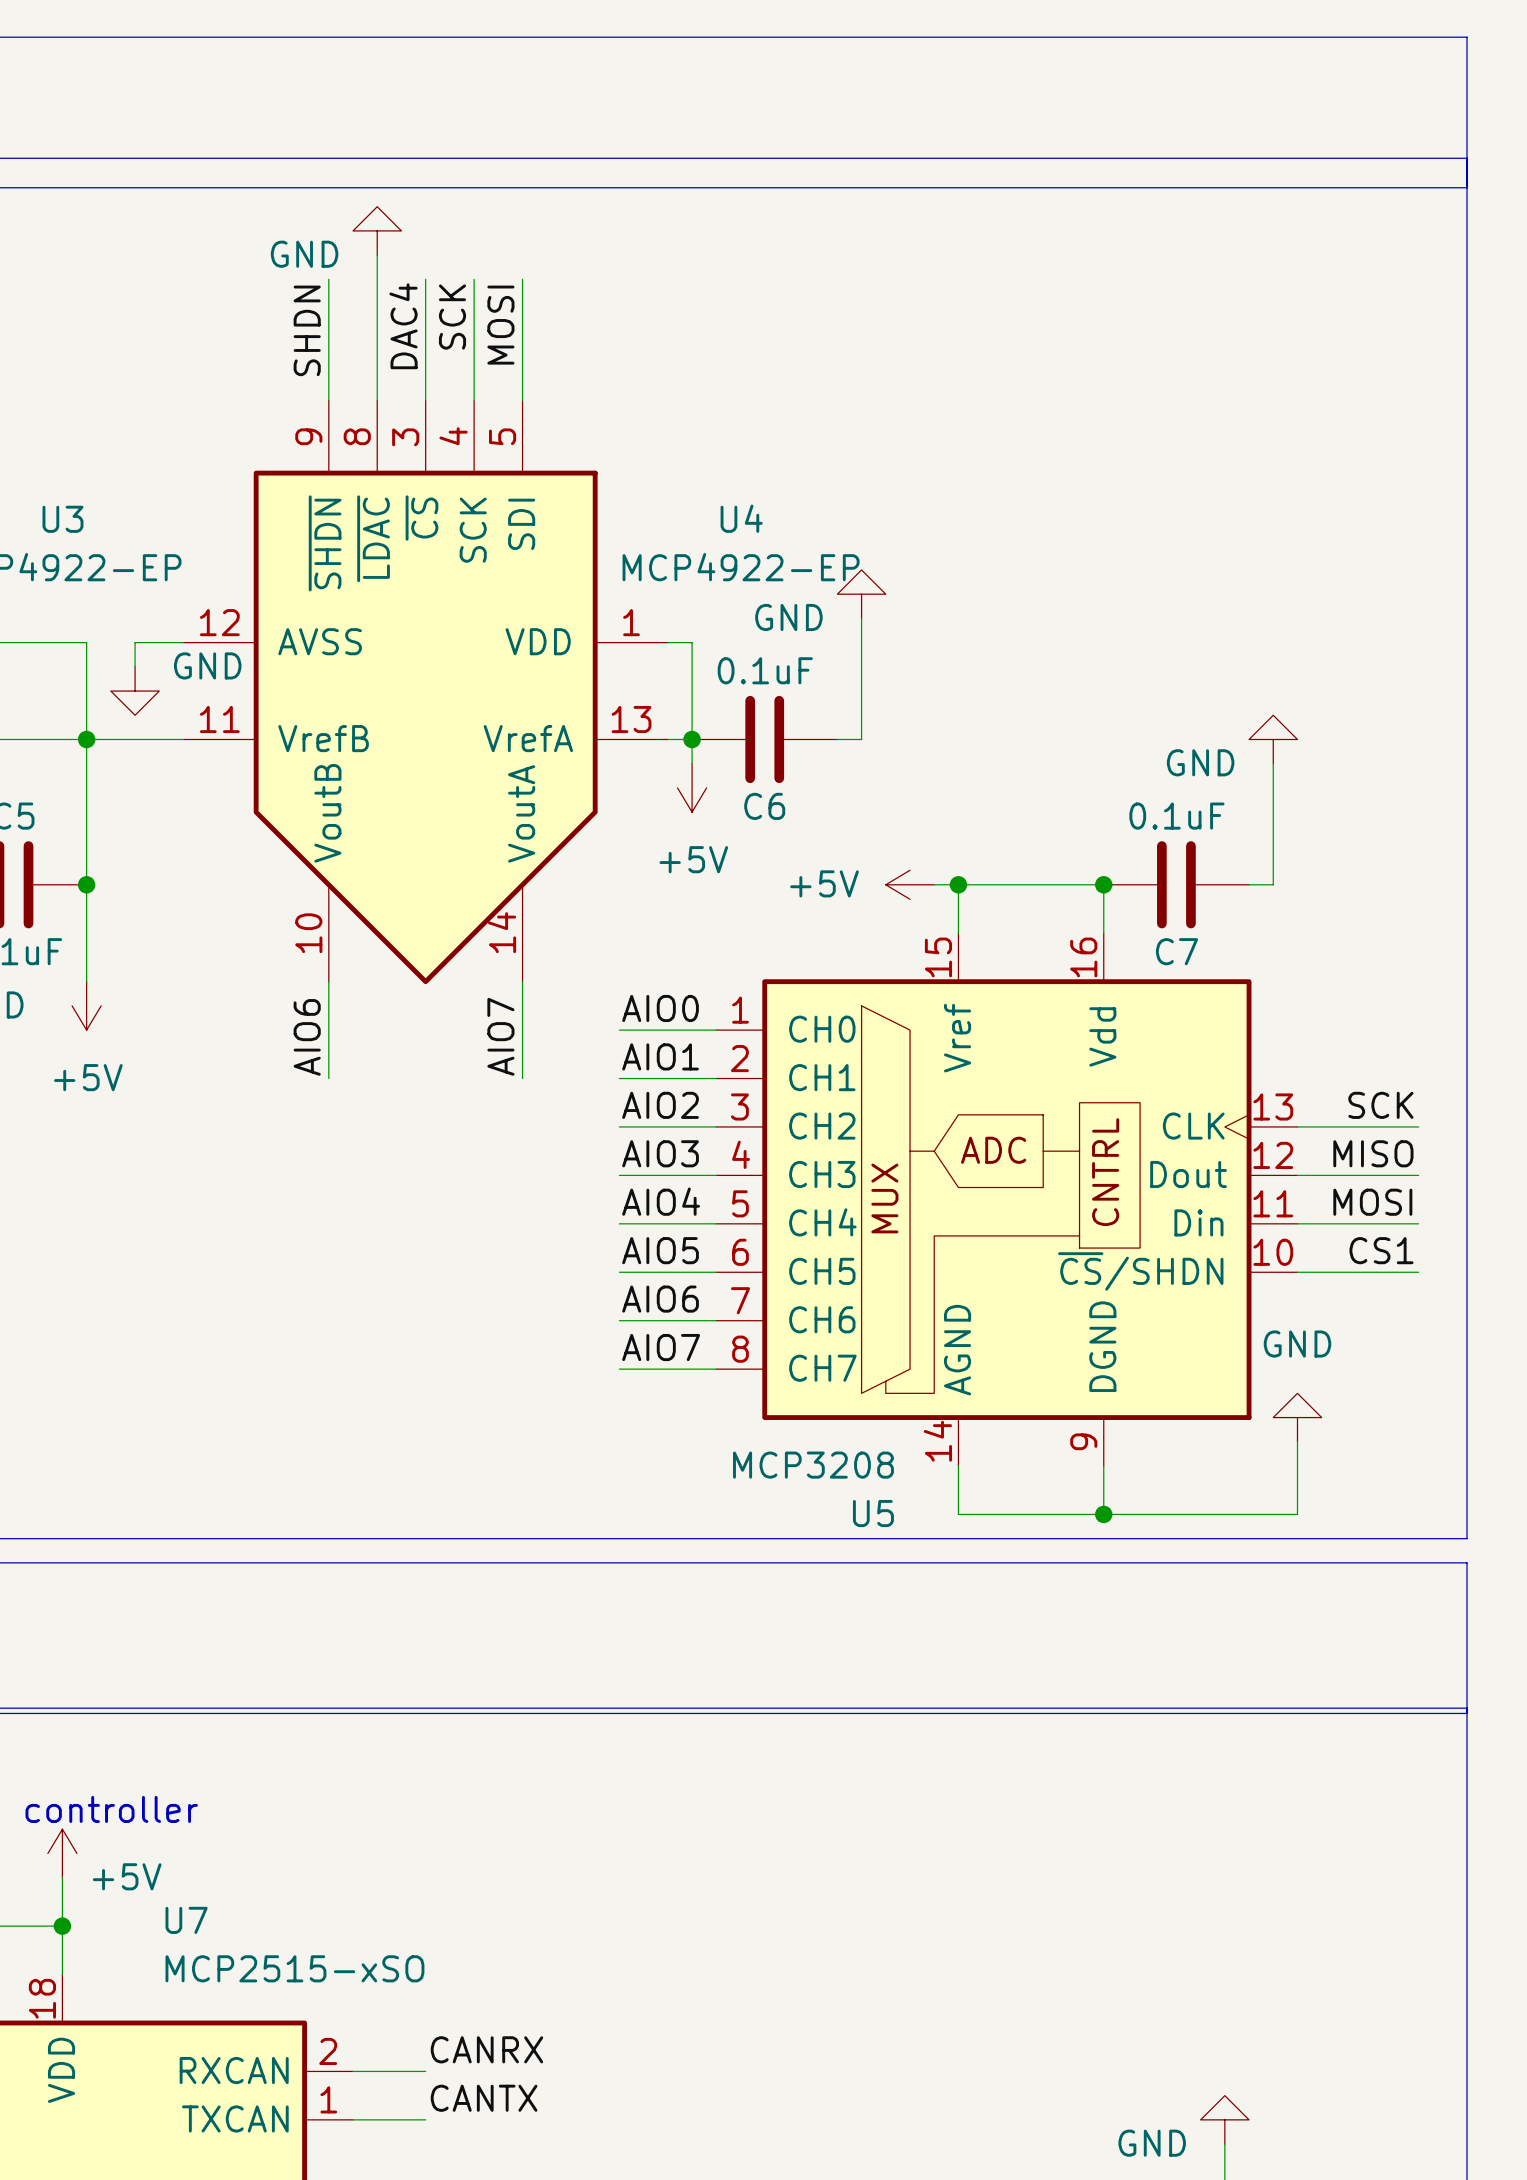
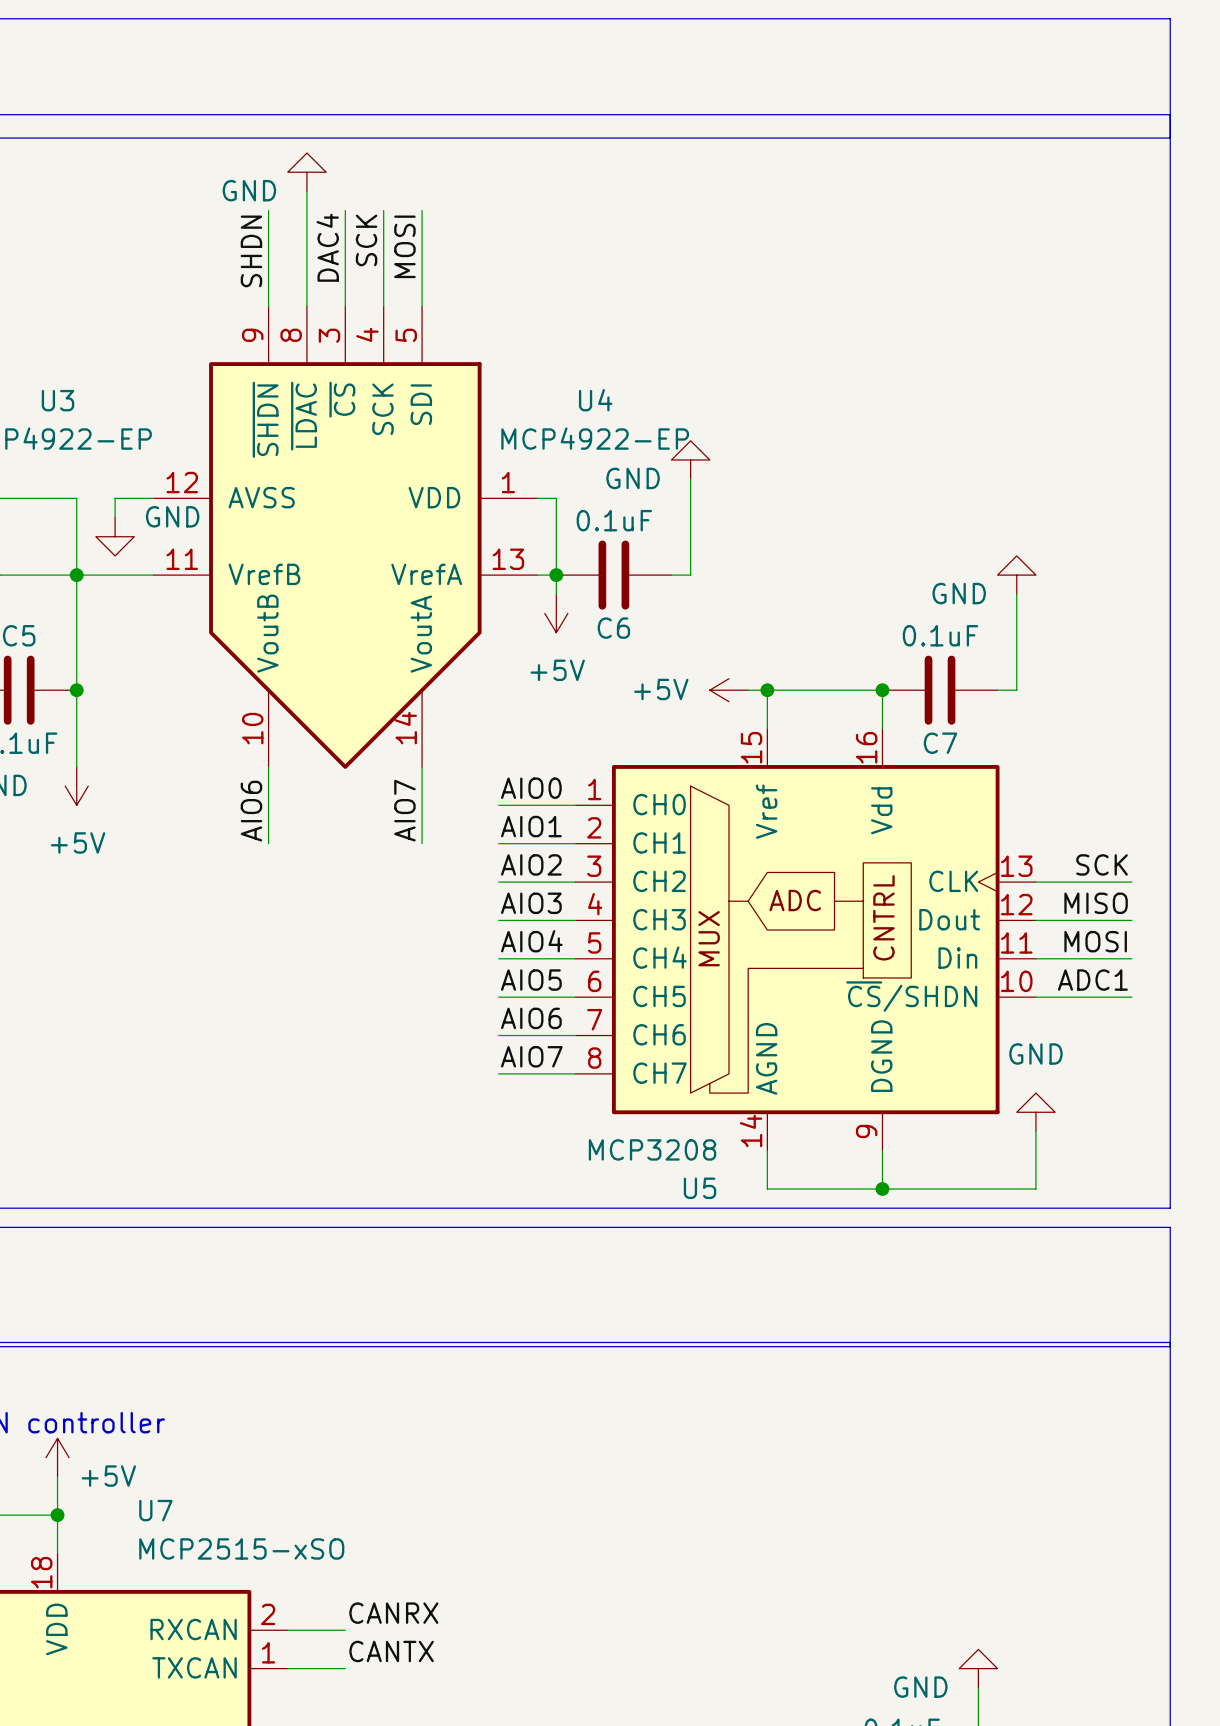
label: CS1 (1381, 1250) -> ADC1 (1092, 980)

